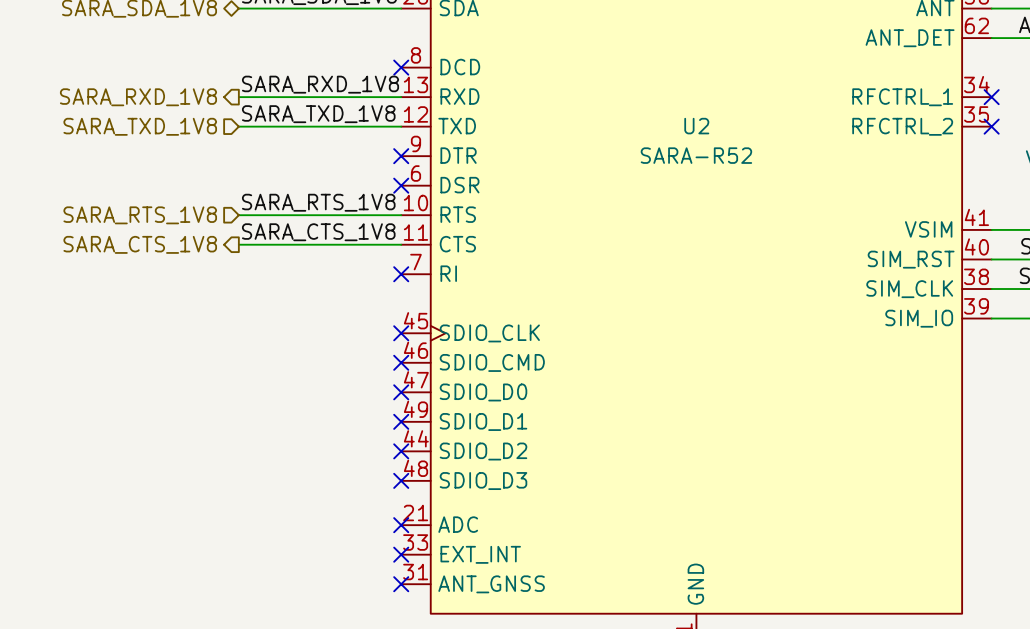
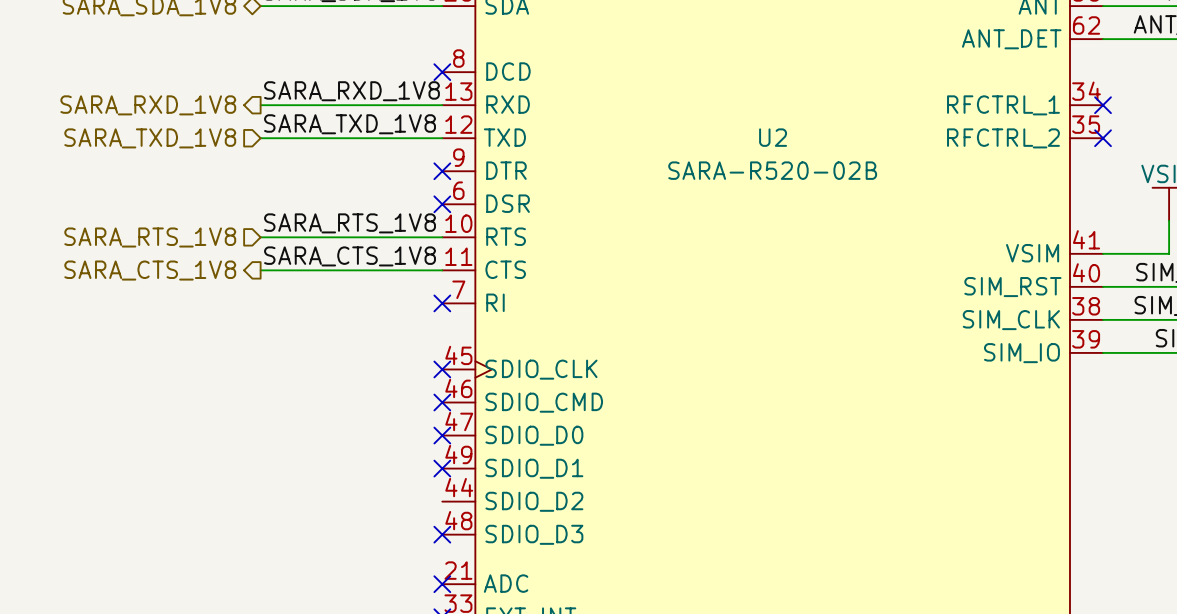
U2 value: SARA-R52 (696, 155) -> SARA-R520-02B (772, 170)
no-connect mark: (401, 451) -> none

